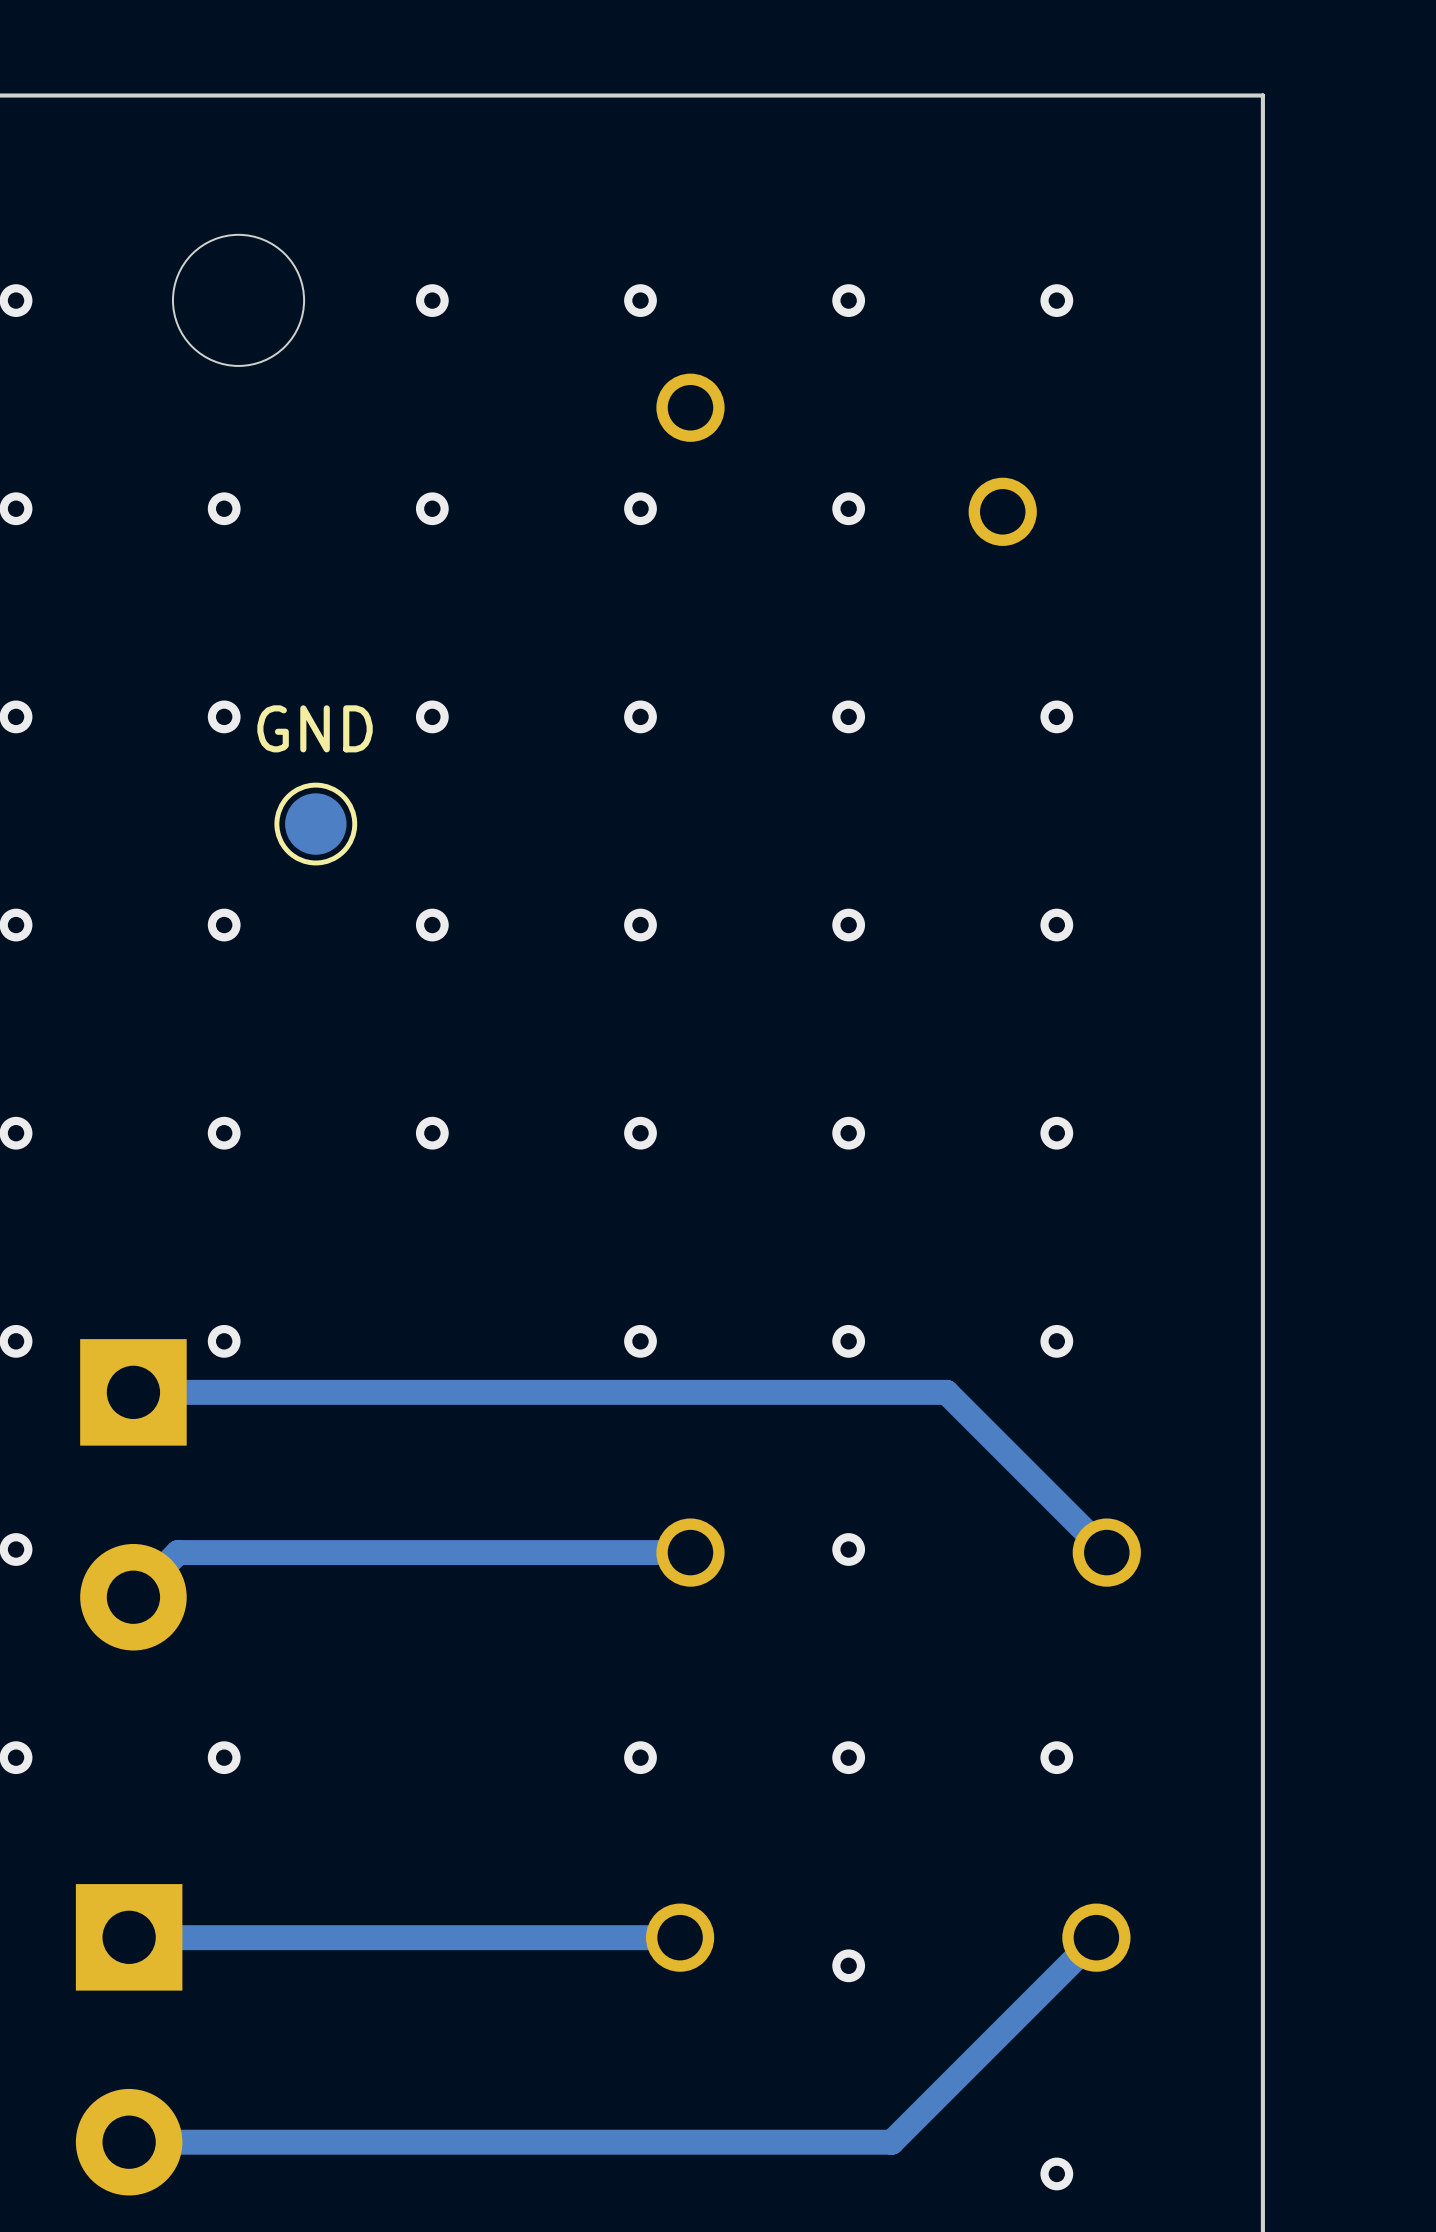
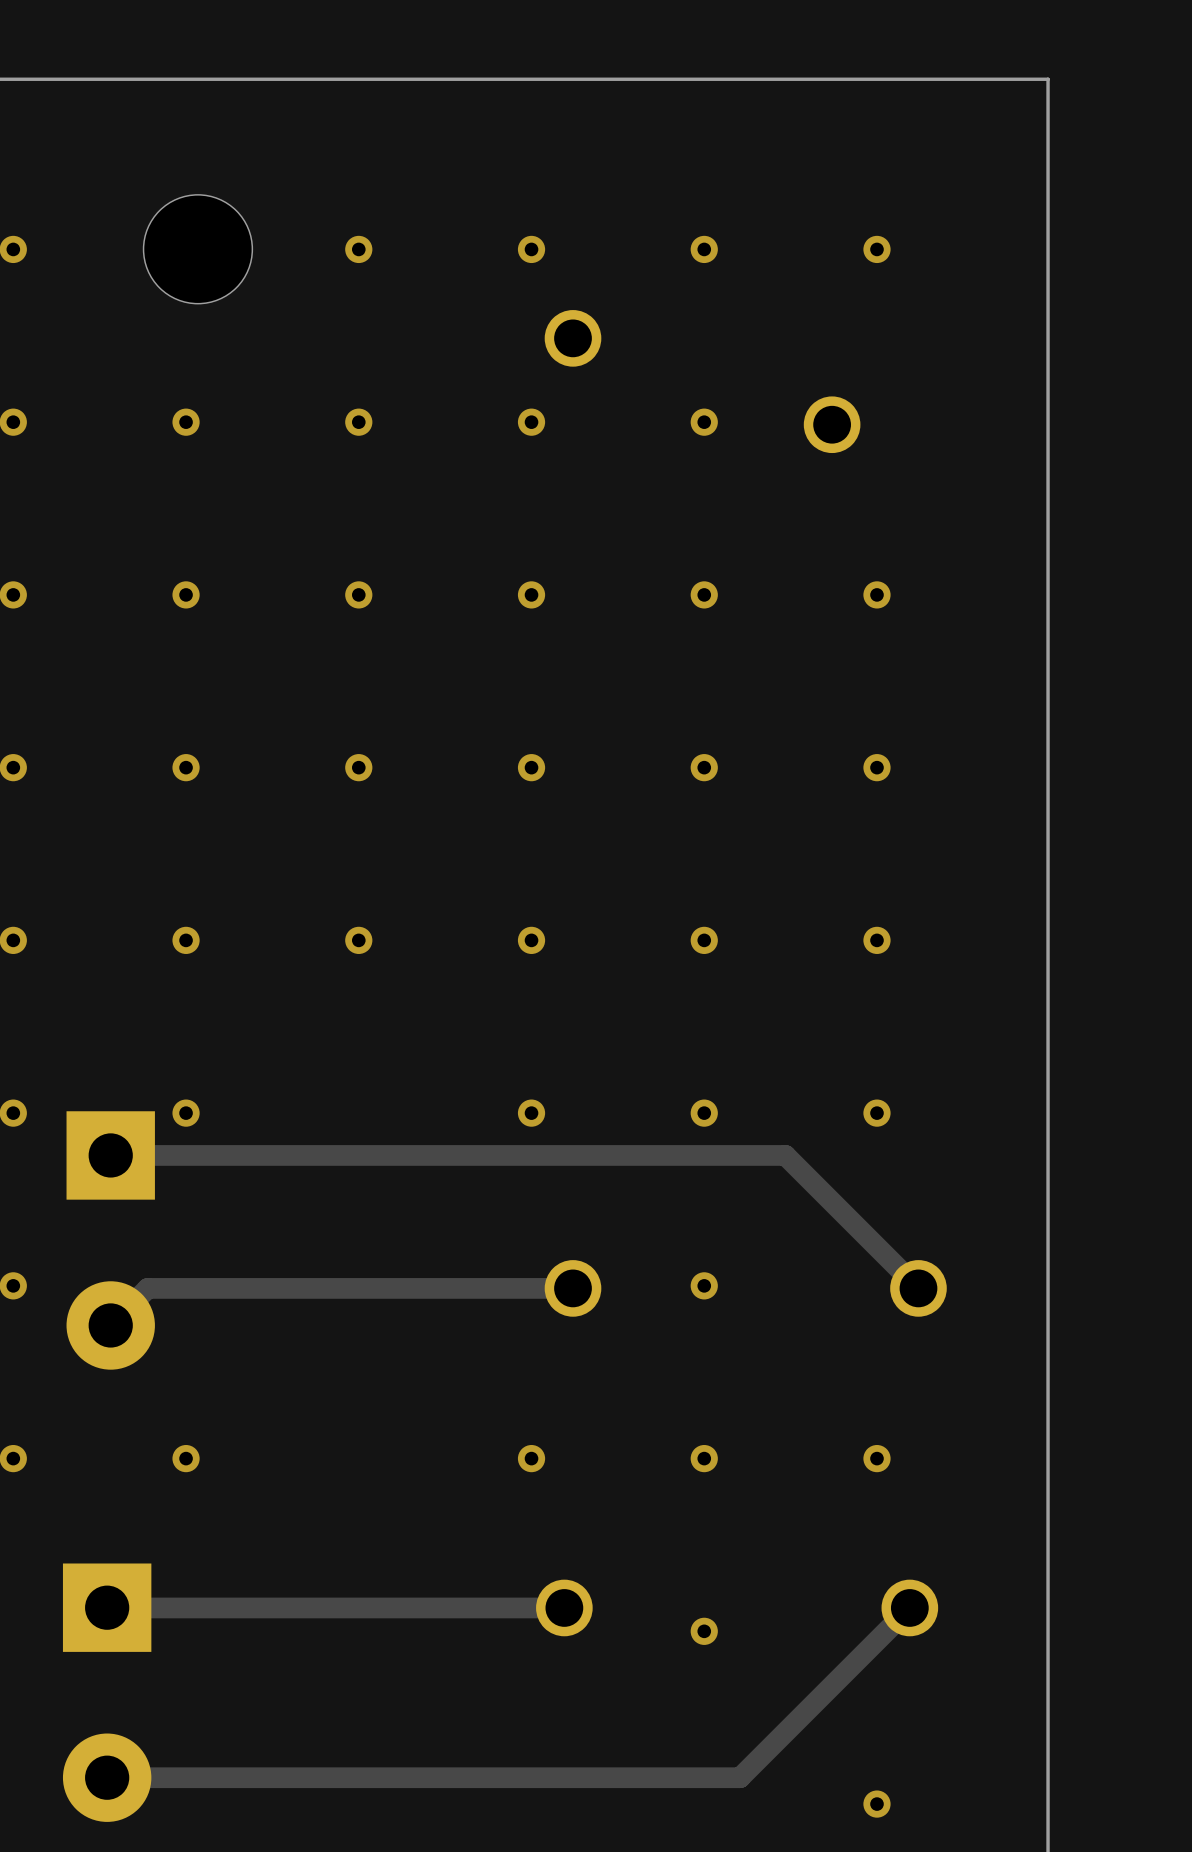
GND: (315, 824) -> none

